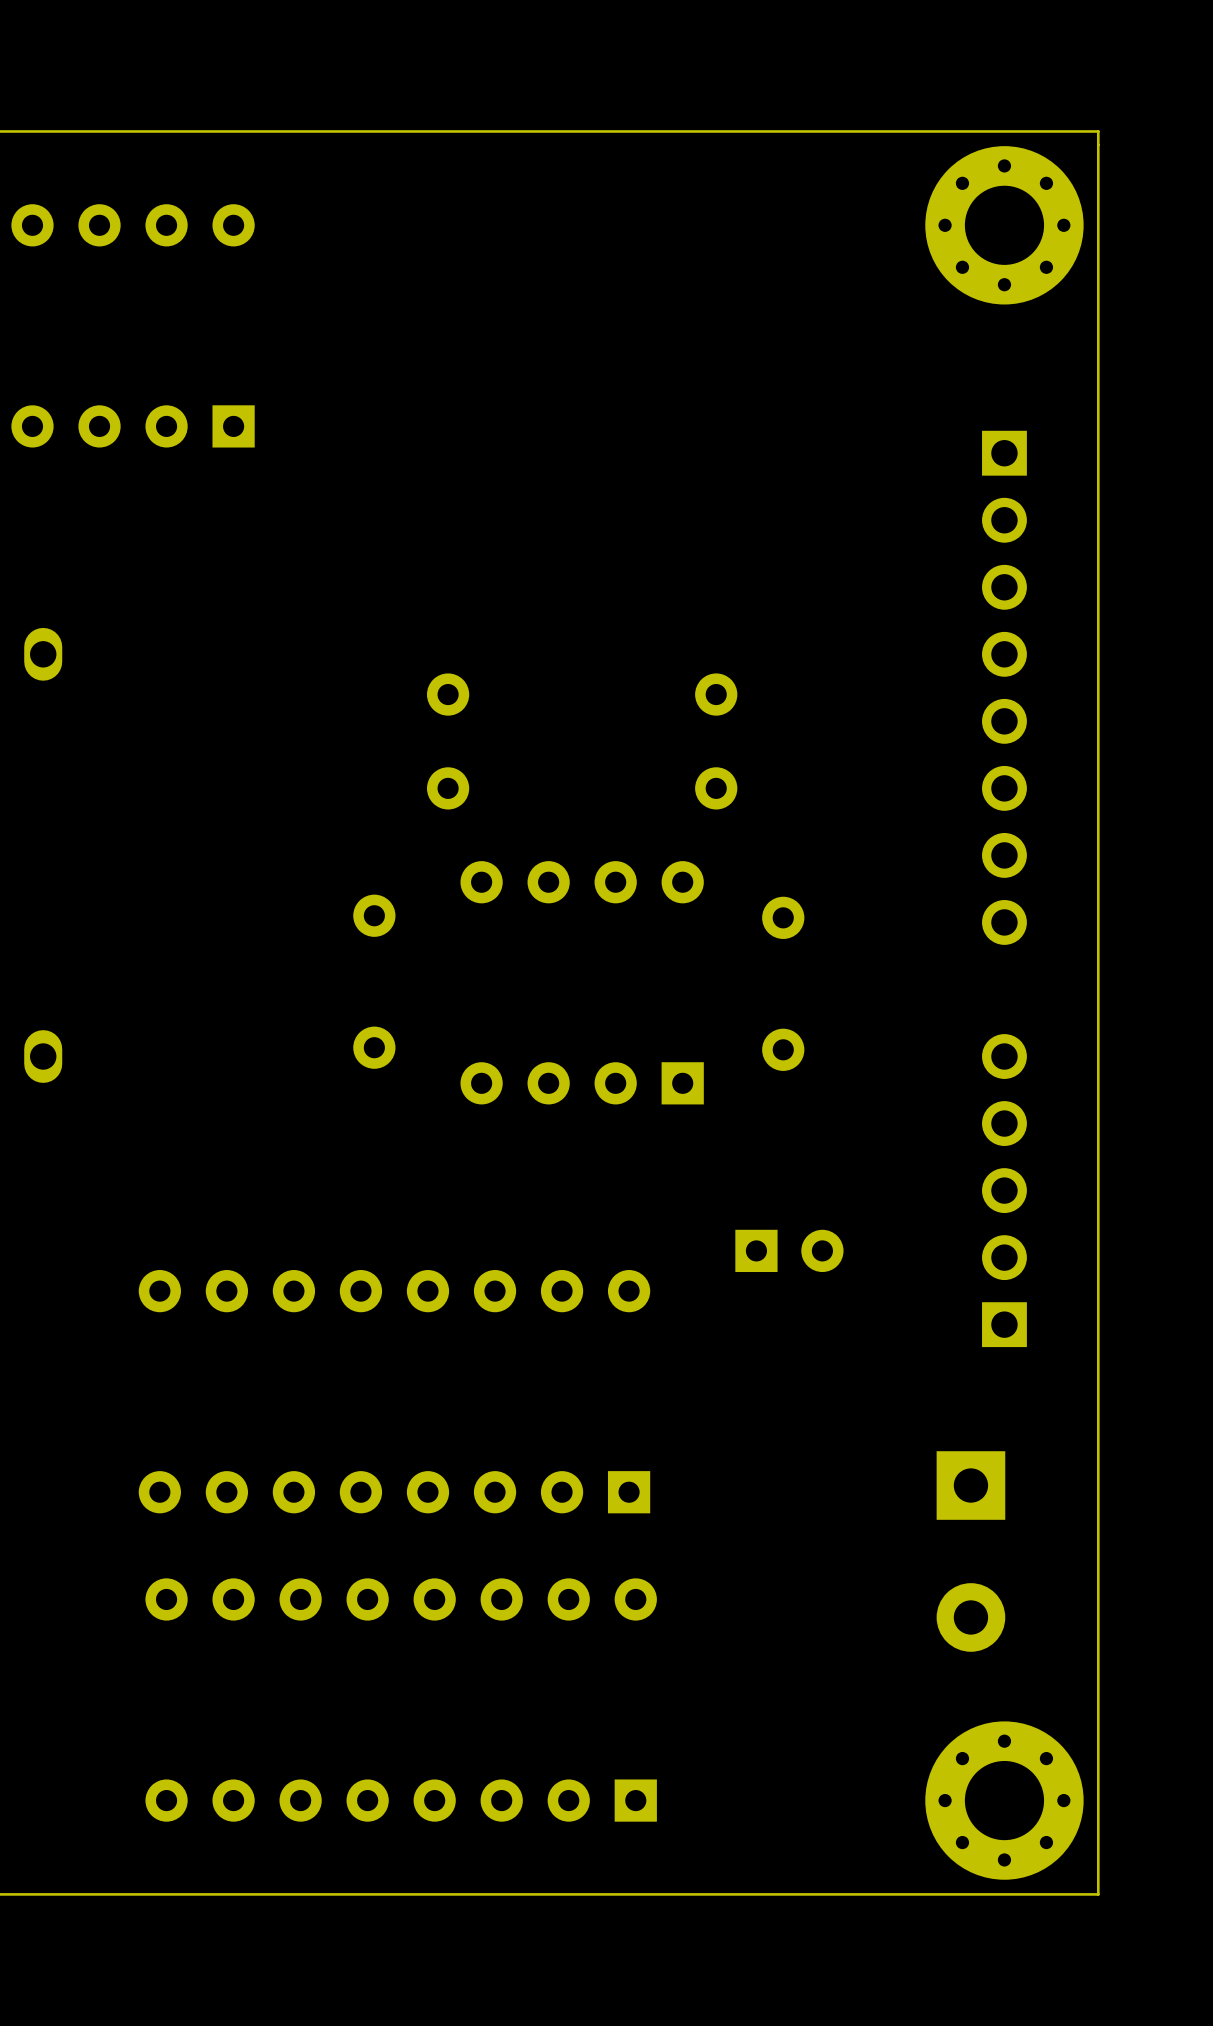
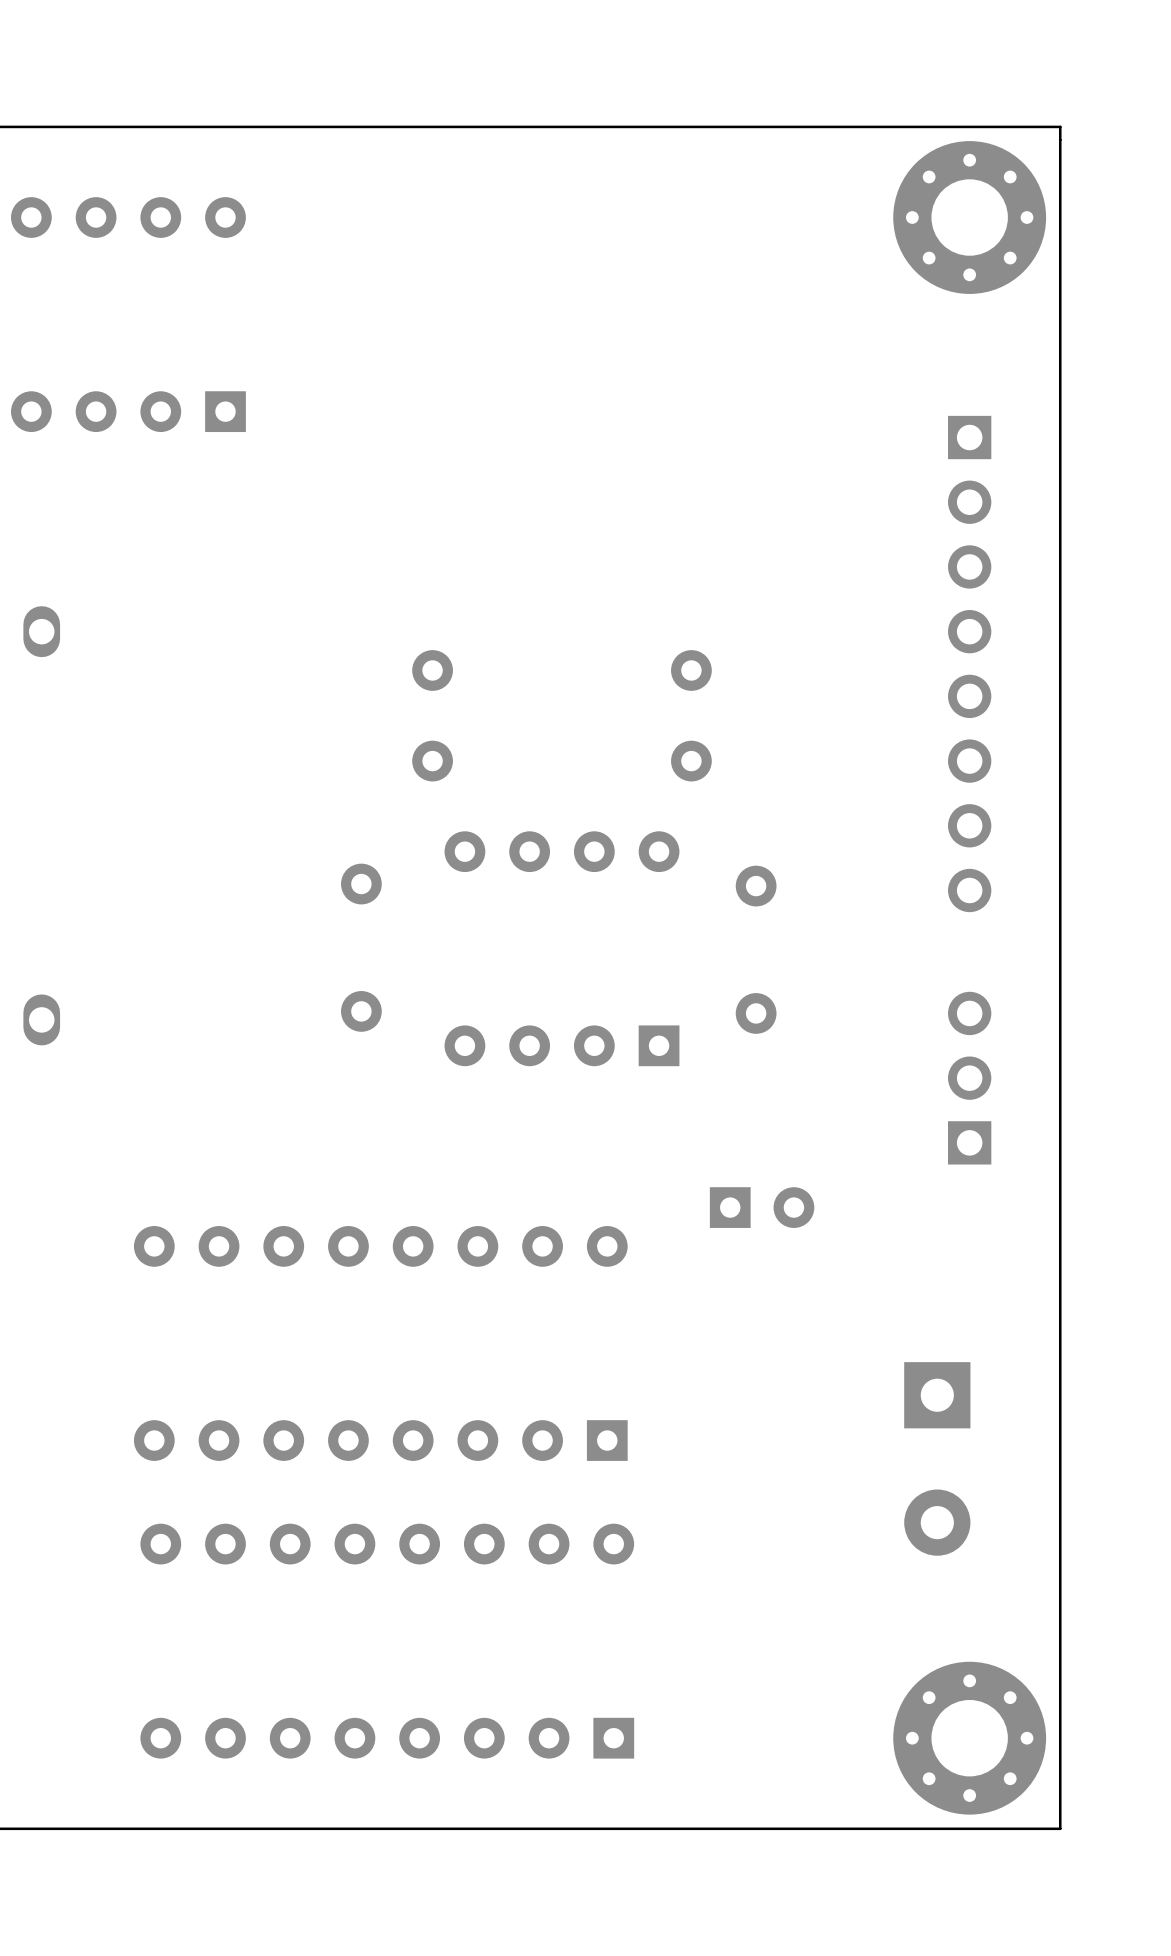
part: none -> (969, 1078)
part: (1004, 1190) -> none
part position: (970, 1551) -> (937, 1458)

